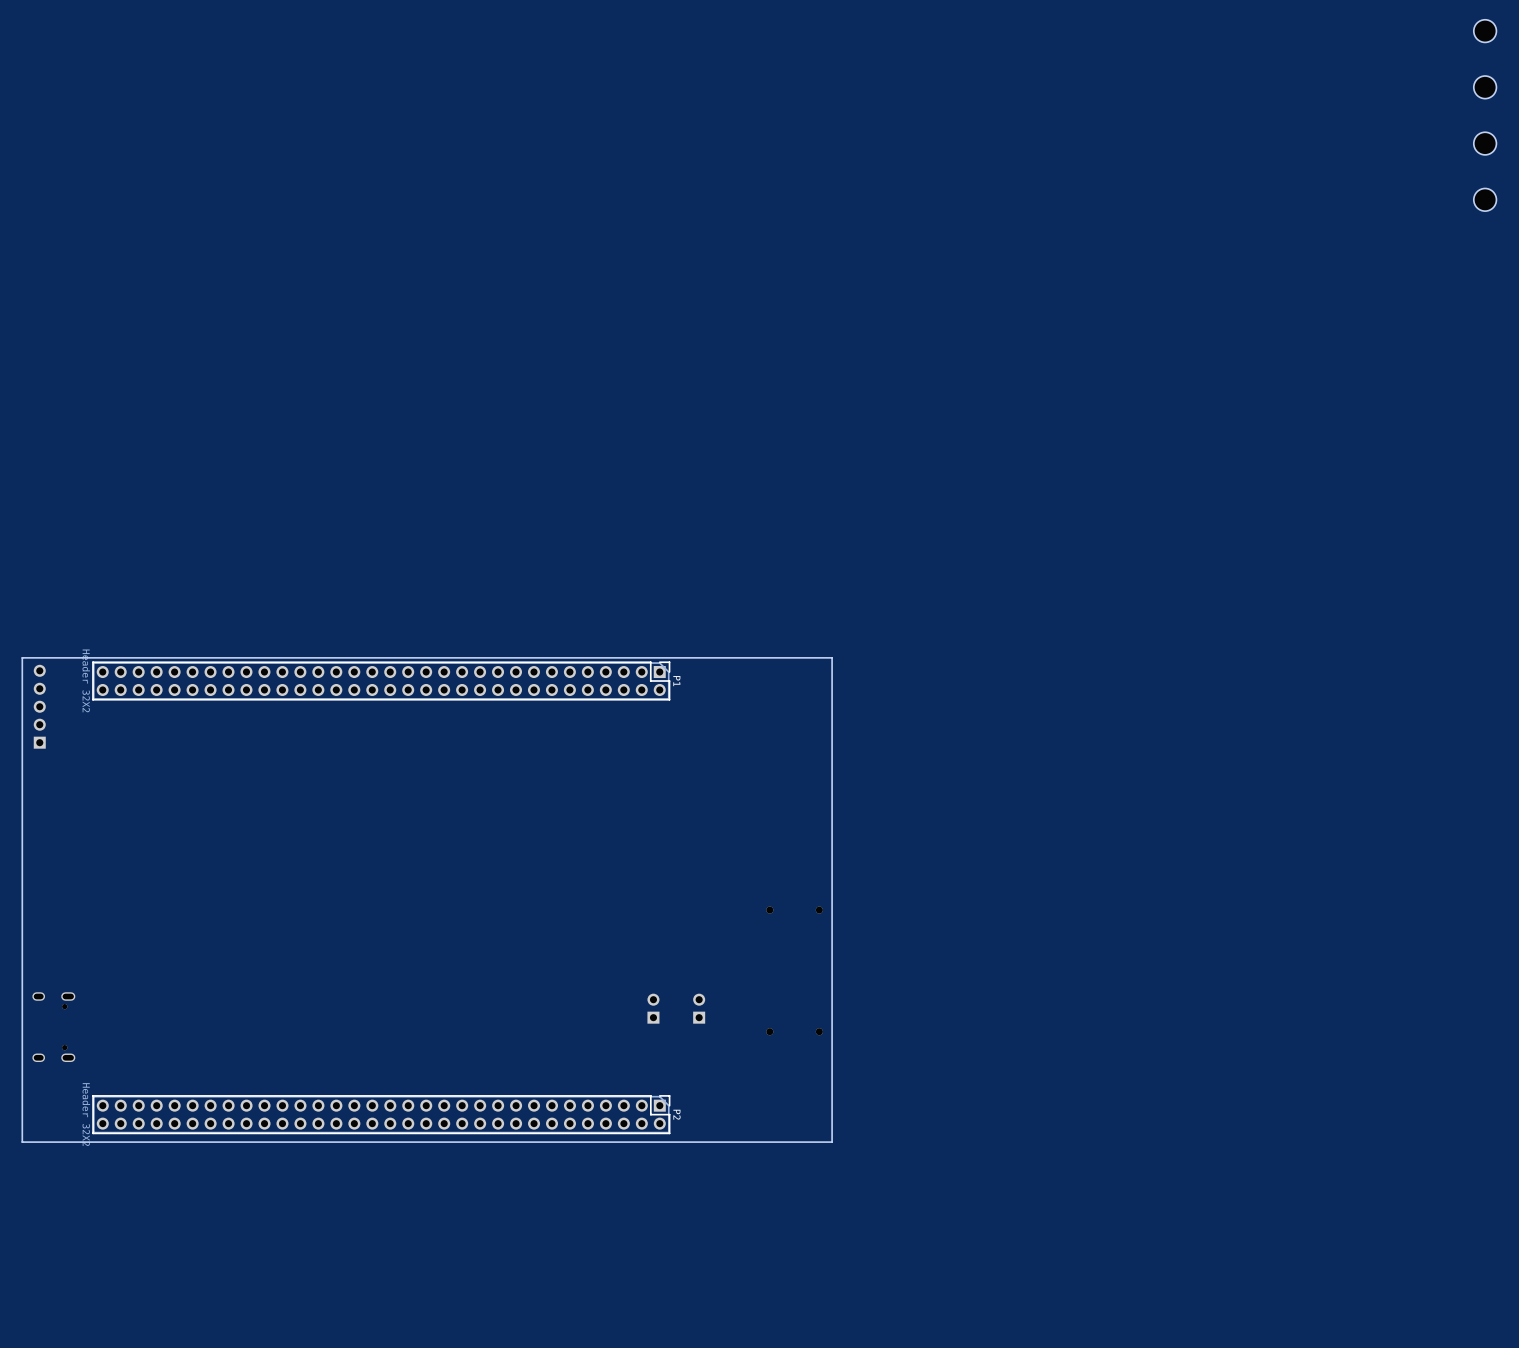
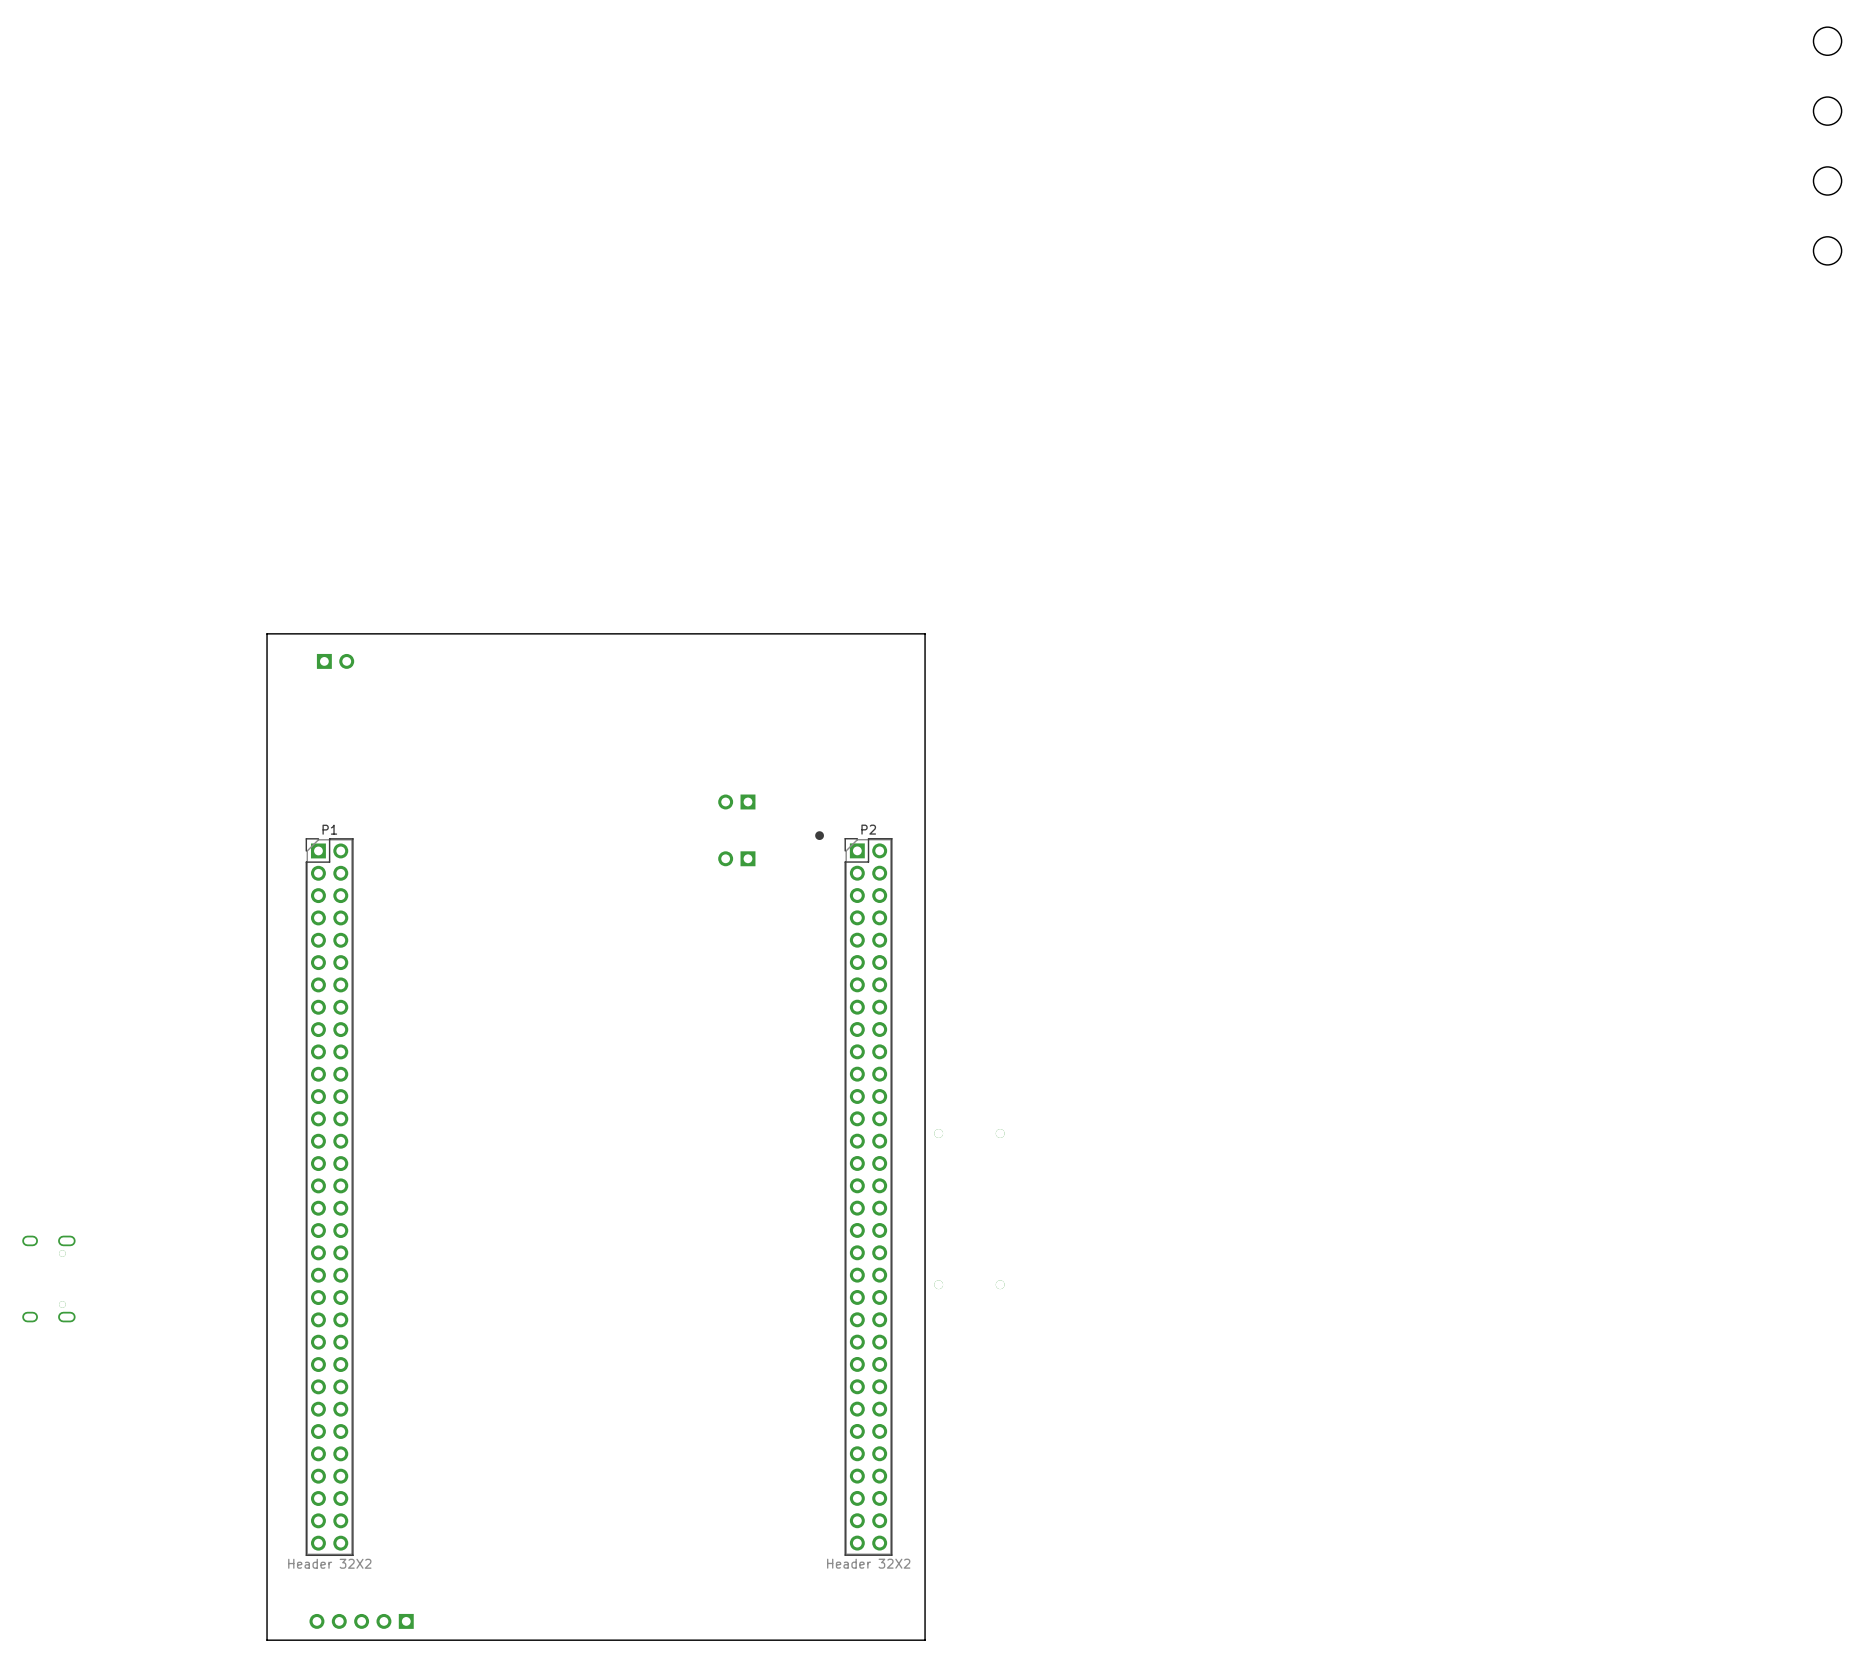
board edge: none -> (925, 633) (267, 633) (267, 1640) (925, 1640) (925, 633)
part: none -> (335, 661)
part: none -> (736, 801)
board edge: (832, 657) (22, 657) (22, 1142) (832, 1142) (832, 657) -> none
drawing: none -> [815, 831, 824, 841]
P1 rotation: 0° (381, 681) -> 90° counterclockwise (329, 1197)
part: none -> (736, 858)
part: (39, 706) -> none
part: (653, 1008) -> none
part: (699, 1008) -> none
P2 rotation: 0° (381, 1114) -> 90° counterclockwise (868, 1196)
P2 position: (381, 1114) -> (868, 1196)
part: none -> (361, 1621)

